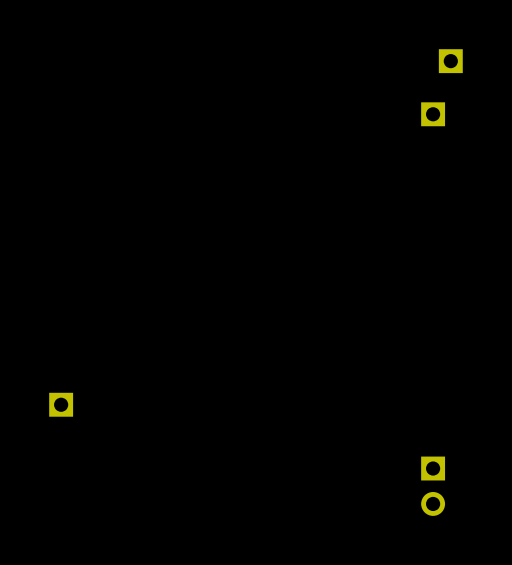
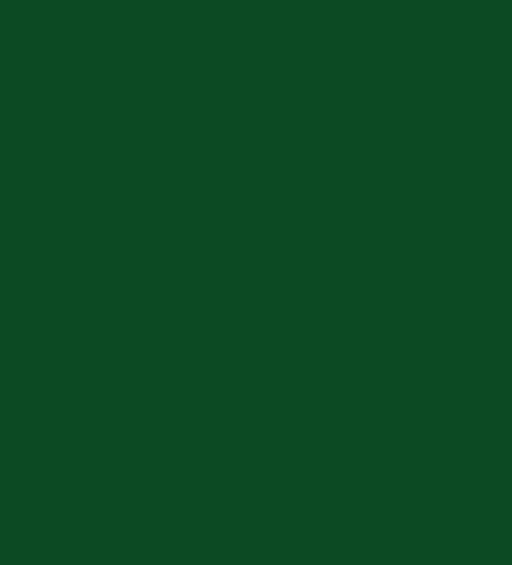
part: (450, 61) -> none
part: (433, 114) -> none
part: (61, 404) -> none
part: (433, 486) -> none

